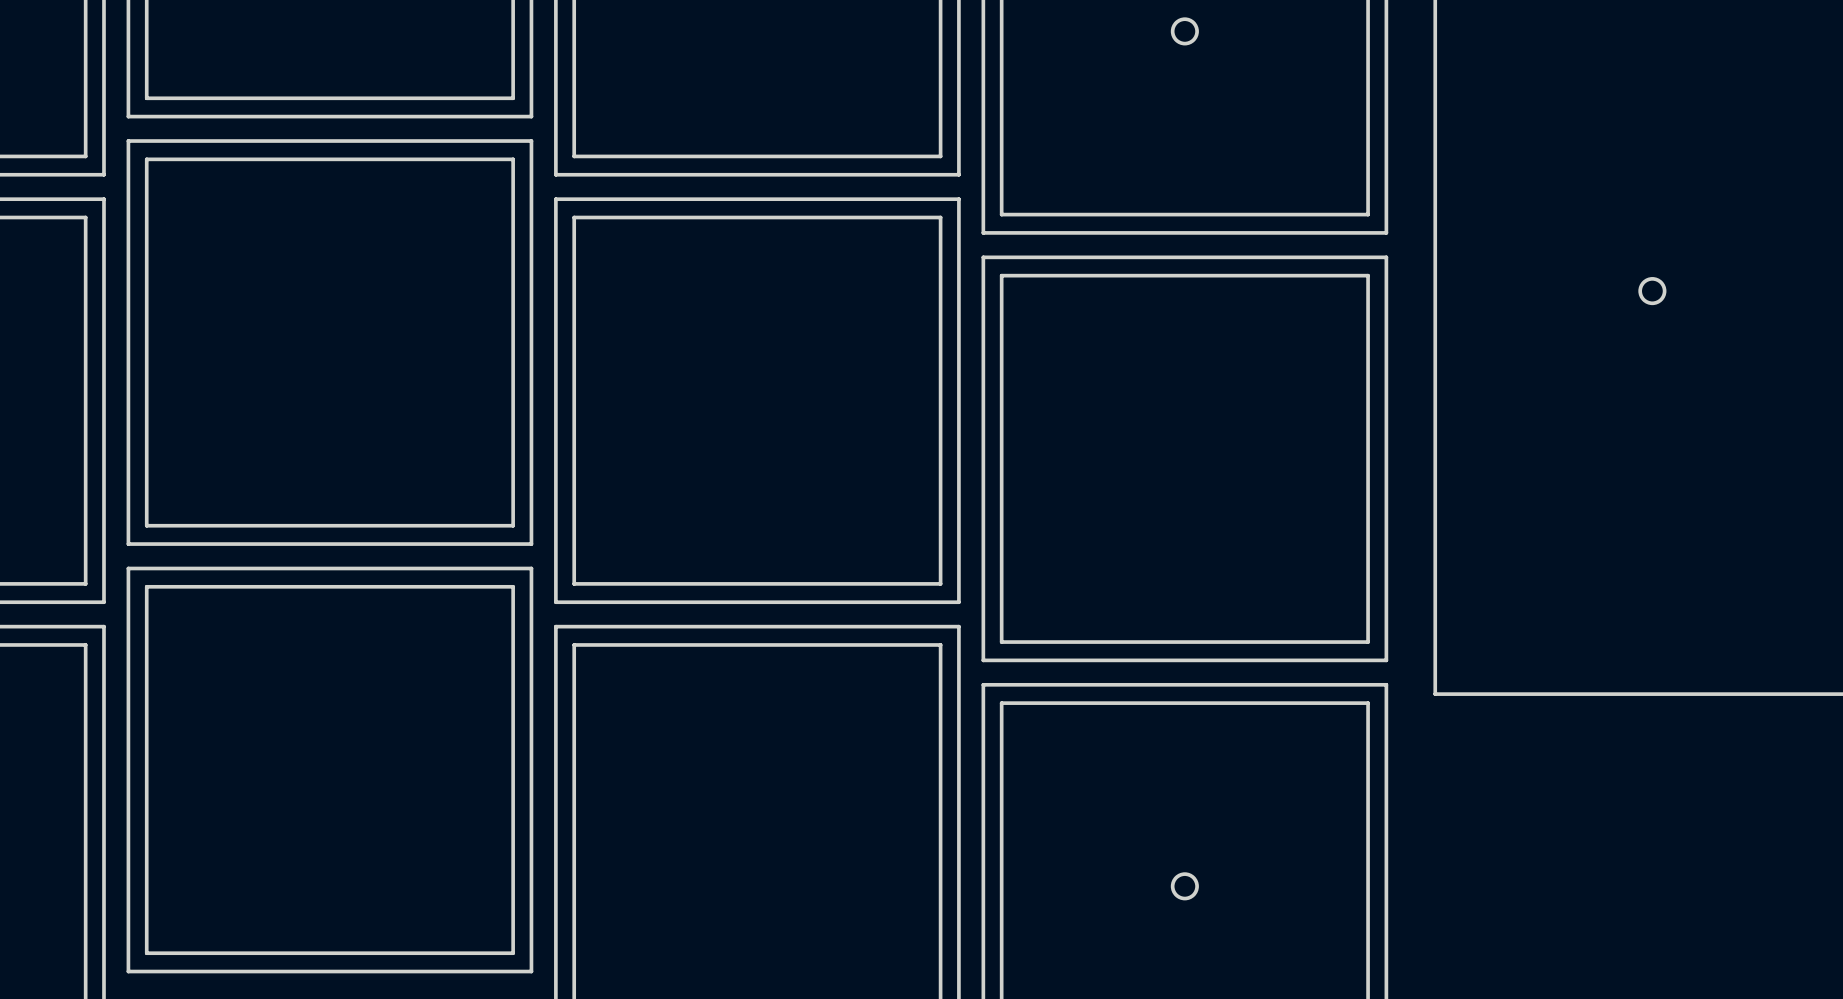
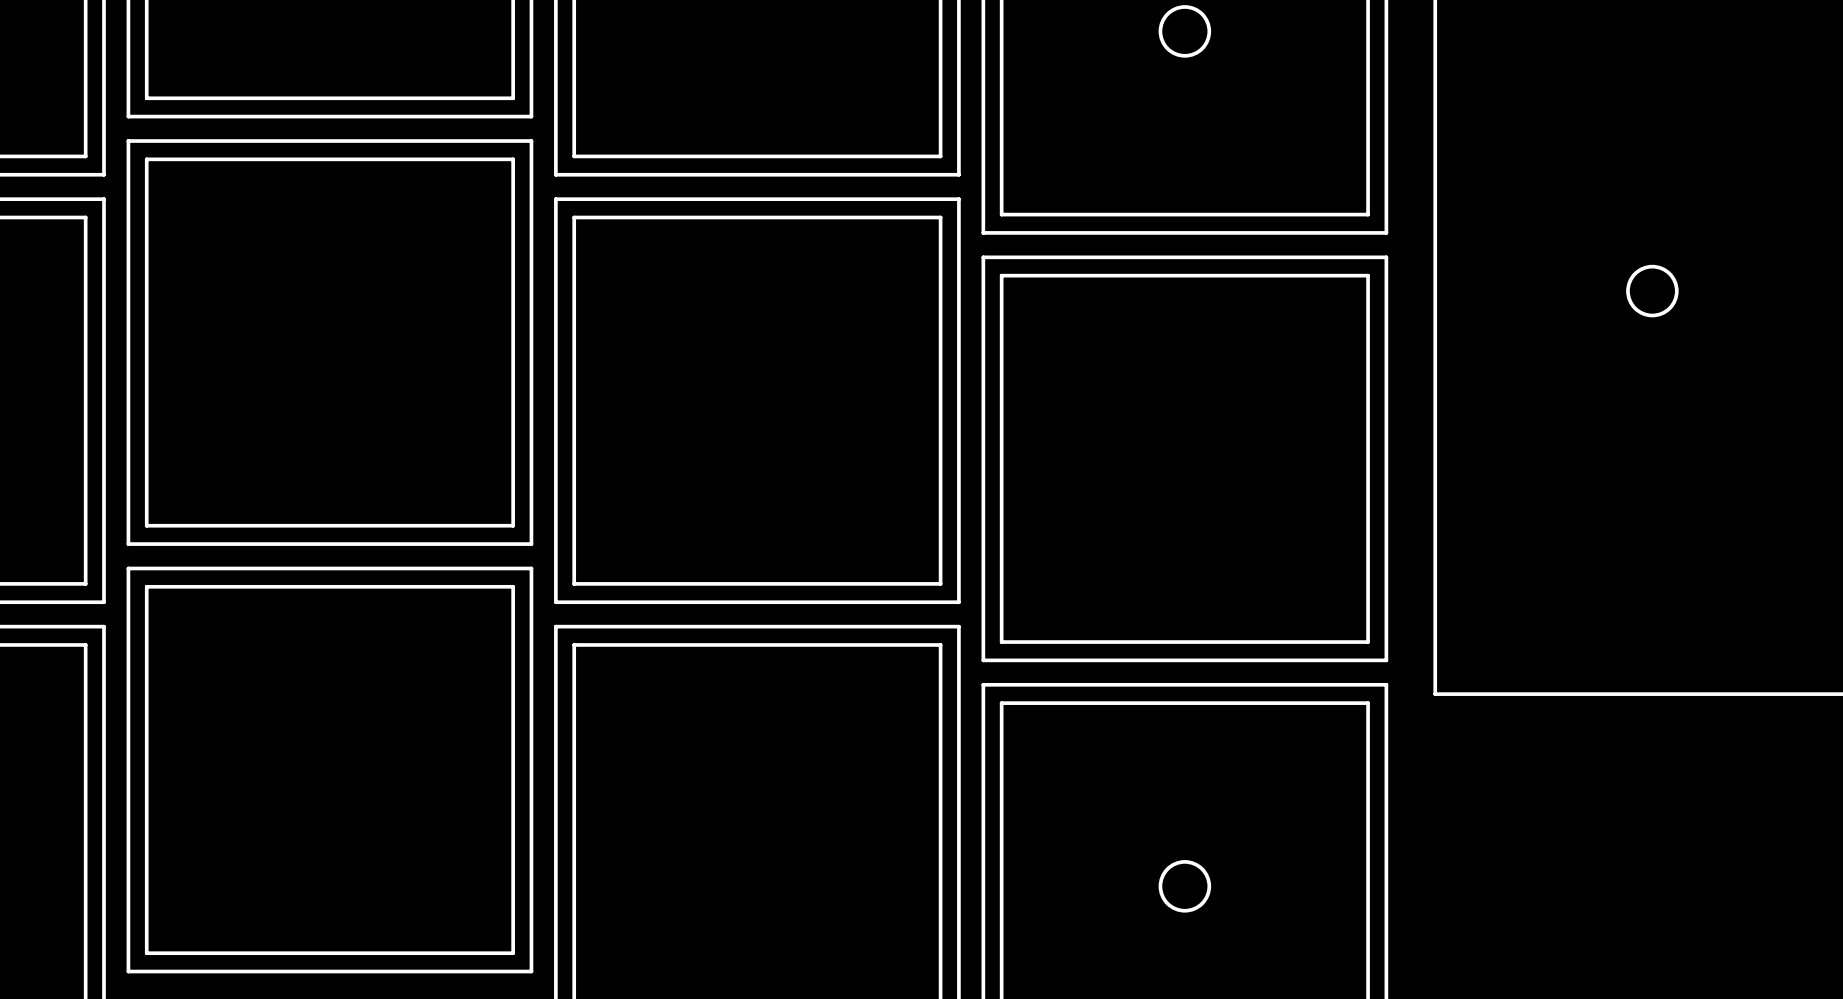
round board edge size: [1170, 17, 1199, 46] -> [1158, 5, 1212, 58]
round board edge size: [1638, 277, 1667, 306] -> [1626, 264, 1679, 318]
round board edge size: [1170, 872, 1199, 901] -> [1158, 860, 1212, 913]

